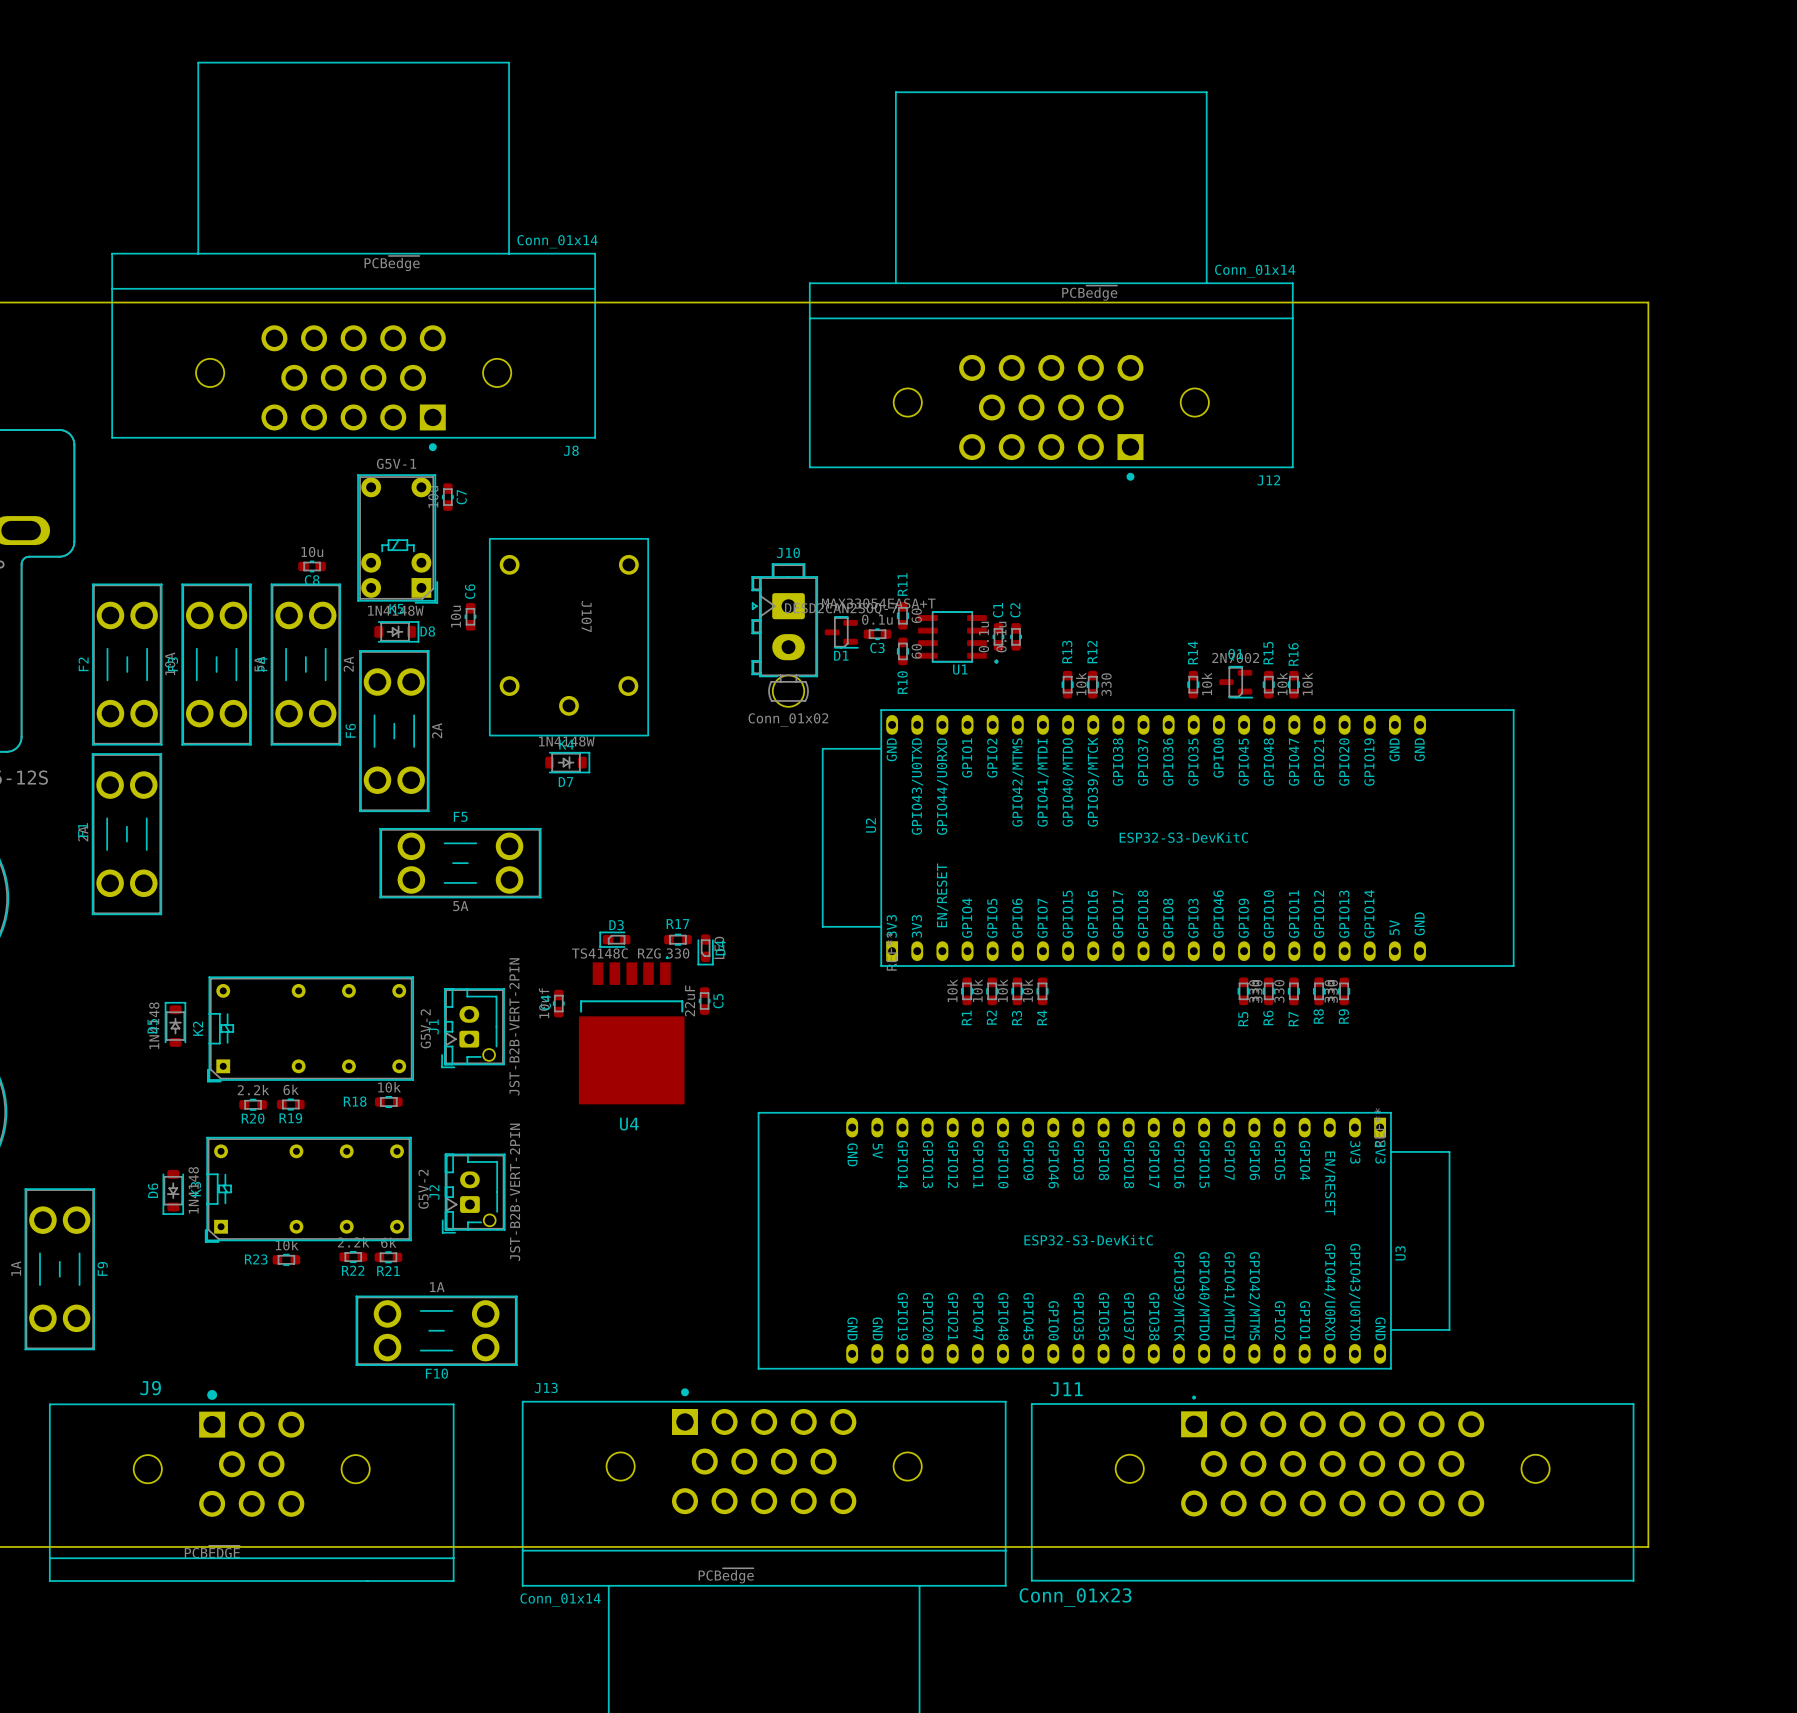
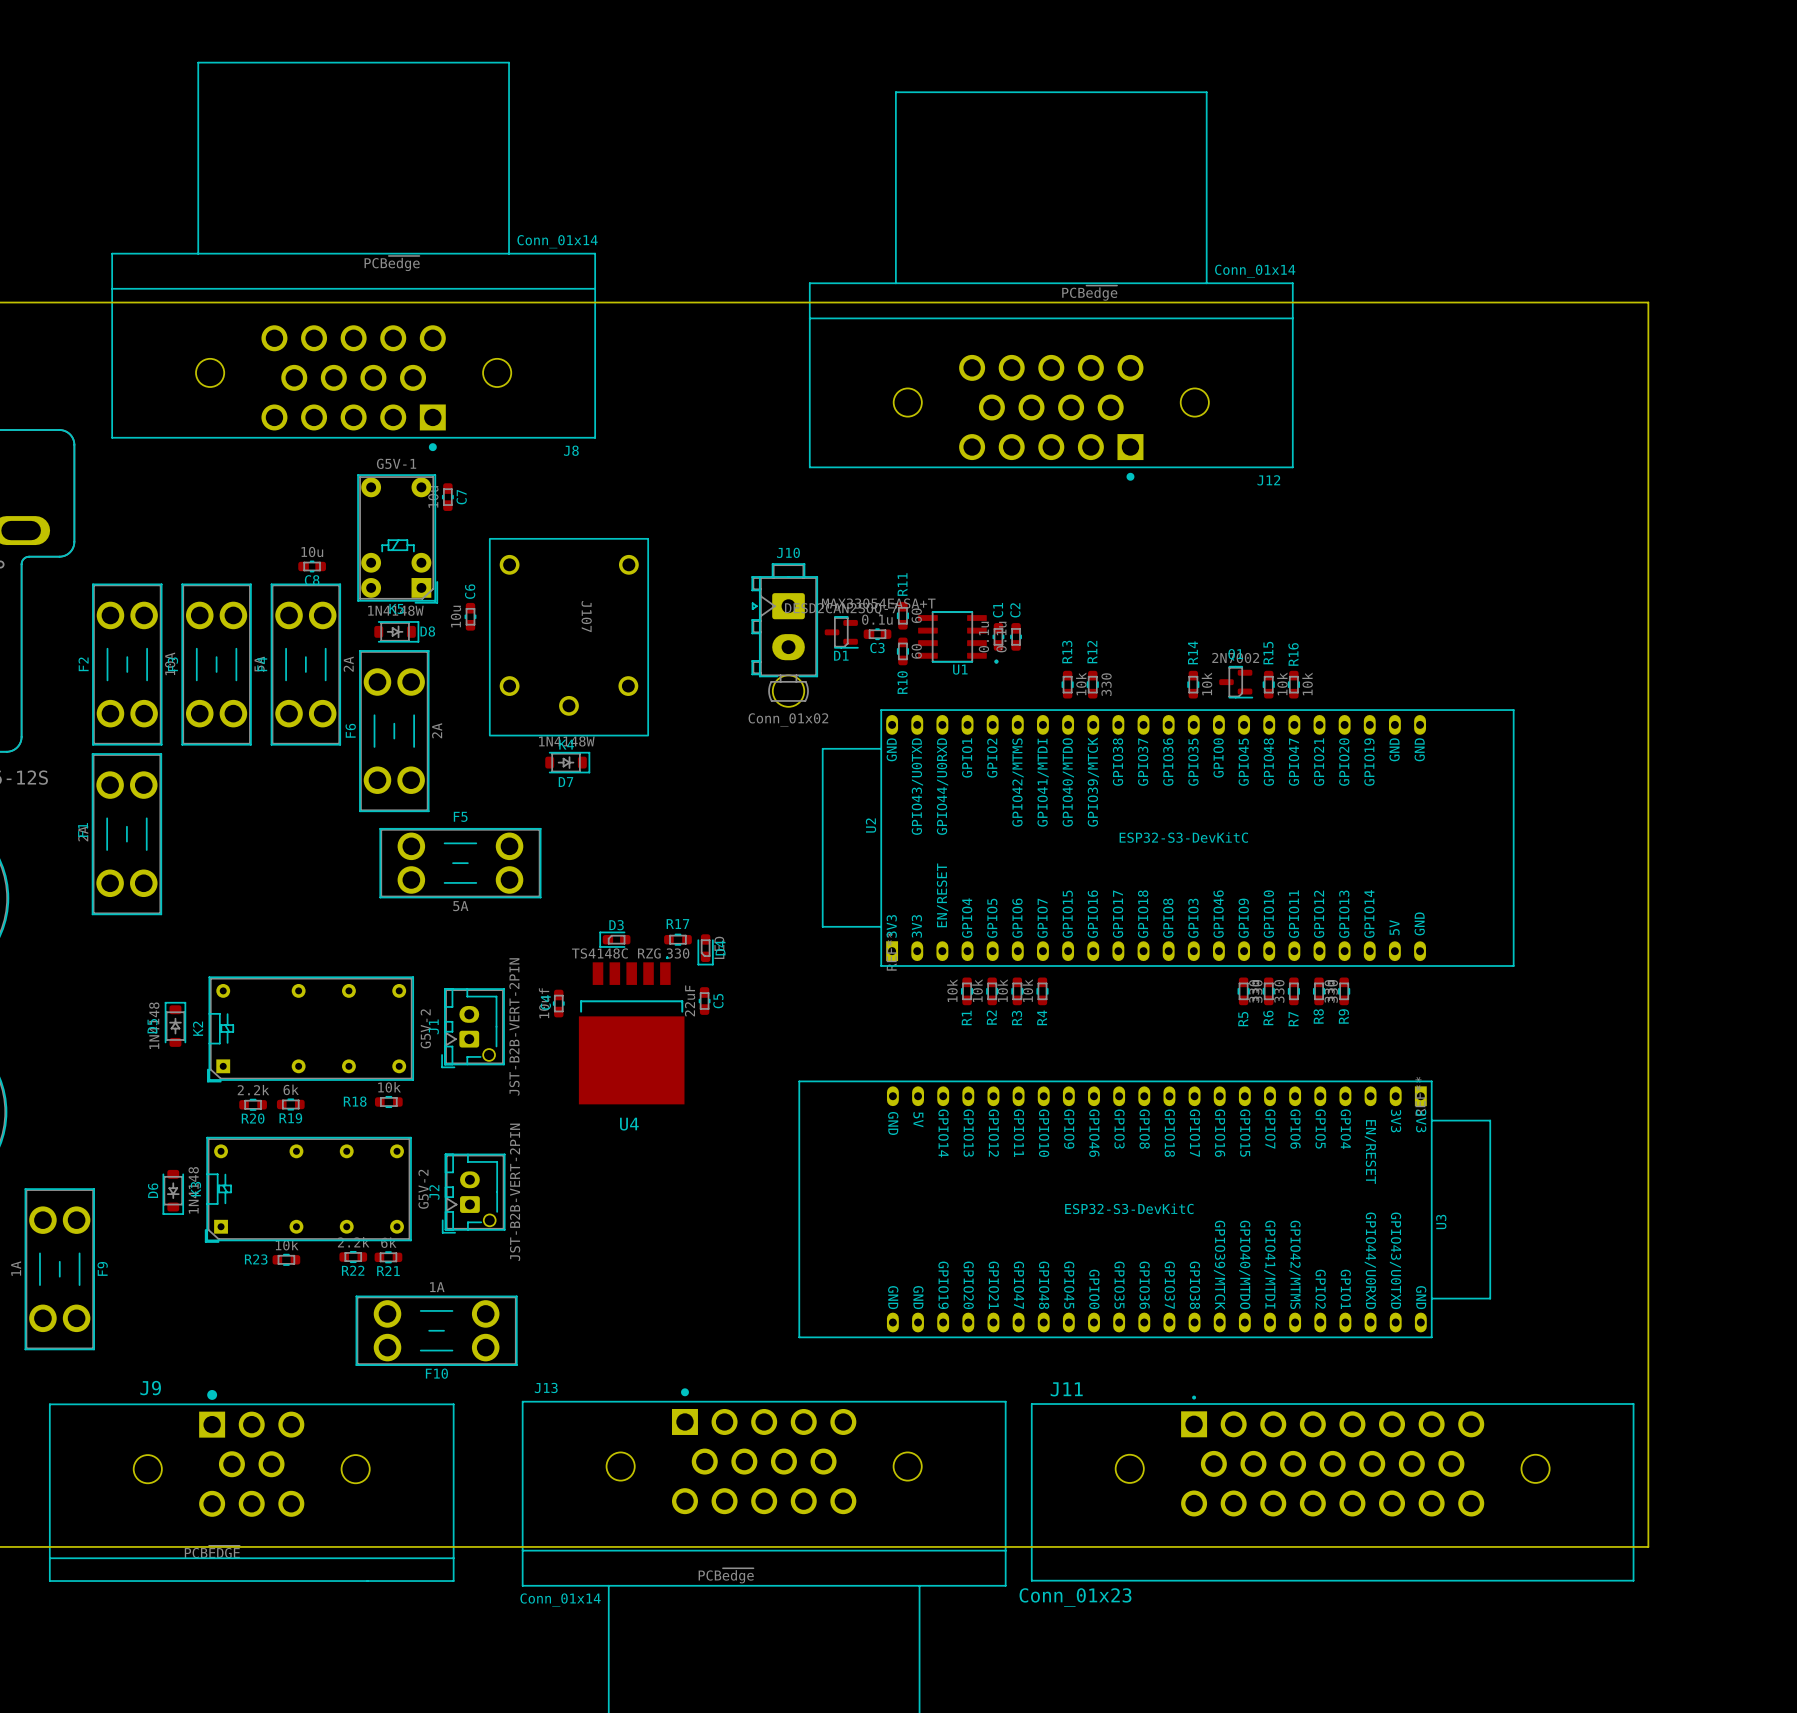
U3 position: (1104, 1240) -> (1144, 1209)

